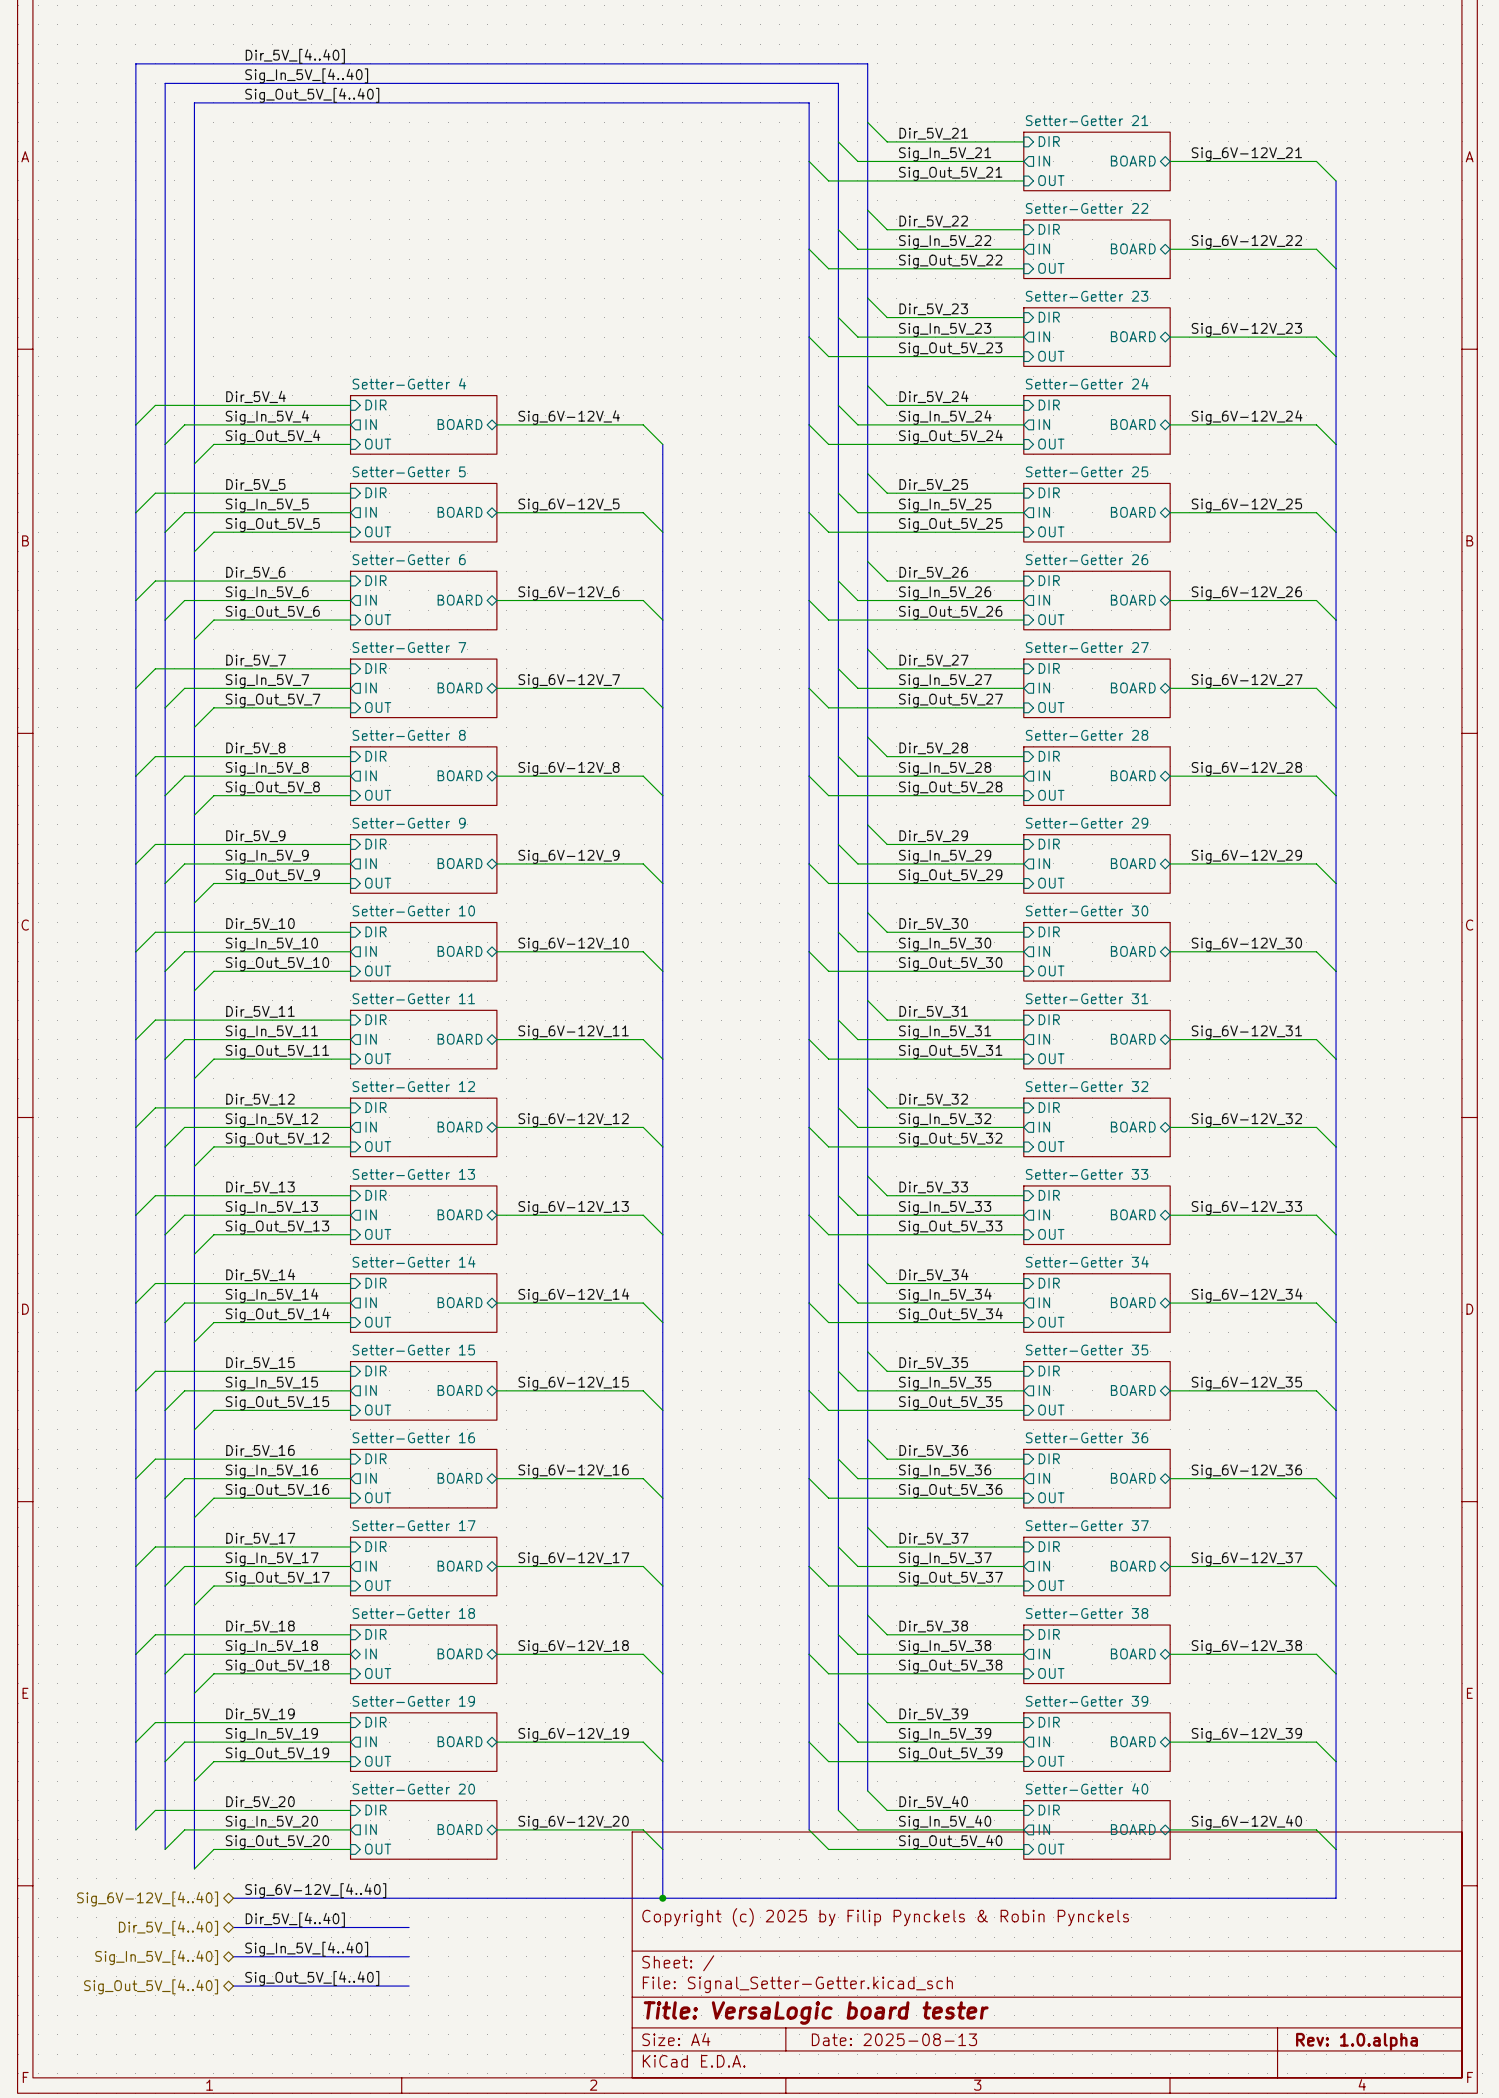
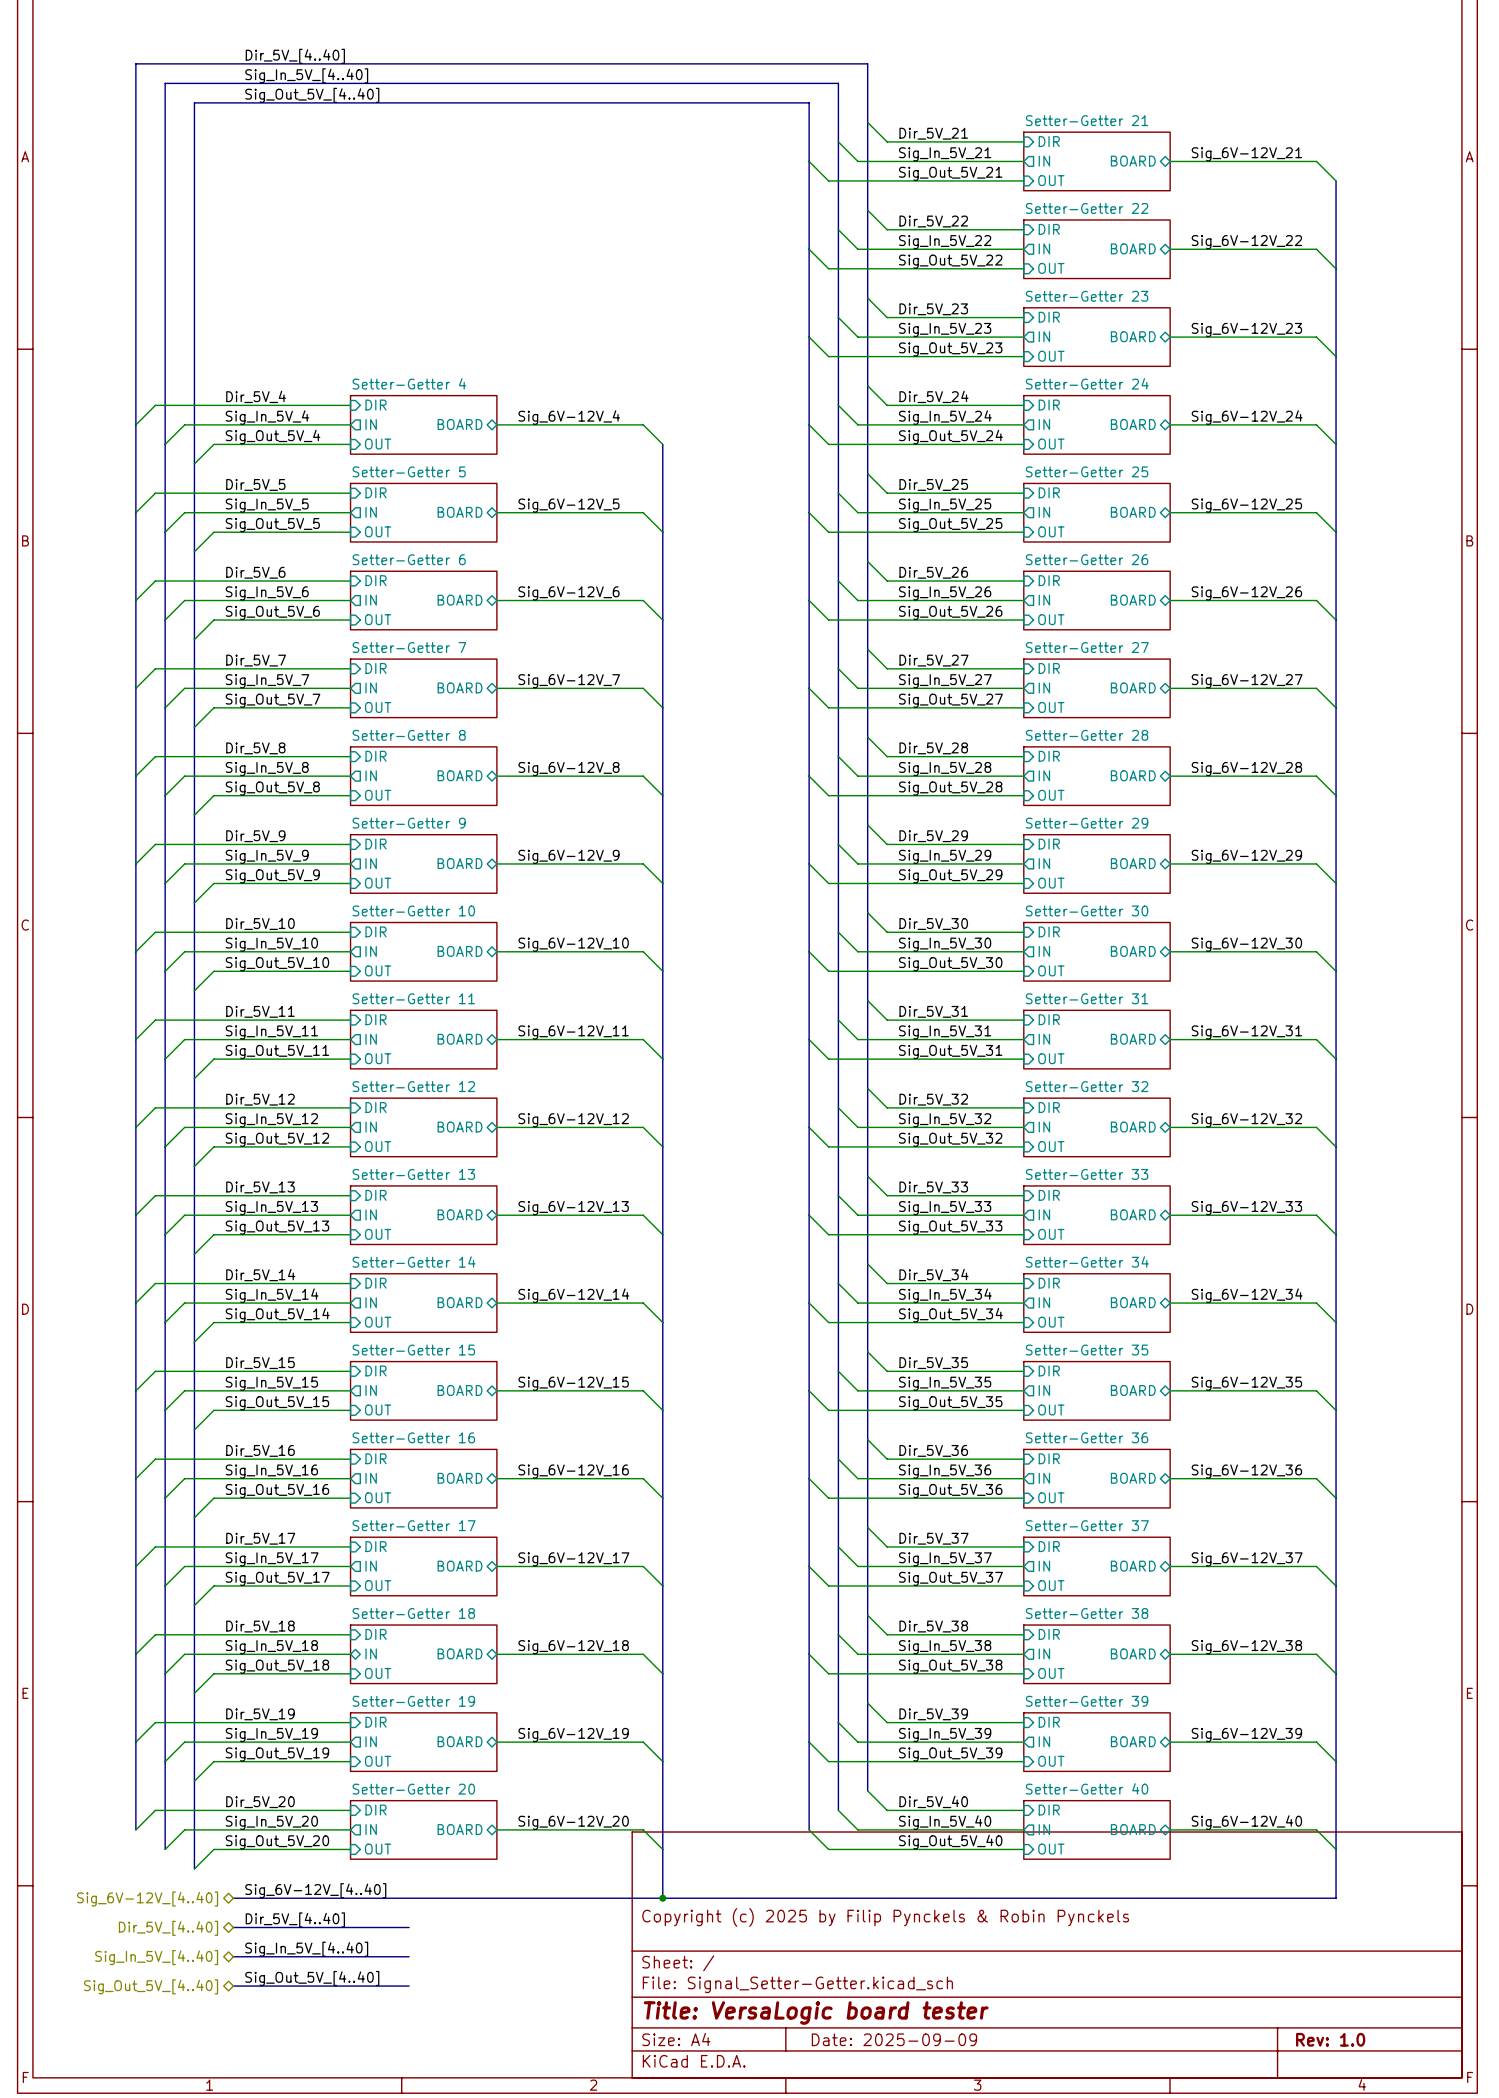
title block: Date: 2025-08-13 (894, 2039) -> Date: 2025-09-09 (894, 2039)
title block: Rev: 1.0.alpha (1357, 2041) -> Rev: 1.0 (1330, 2039)

